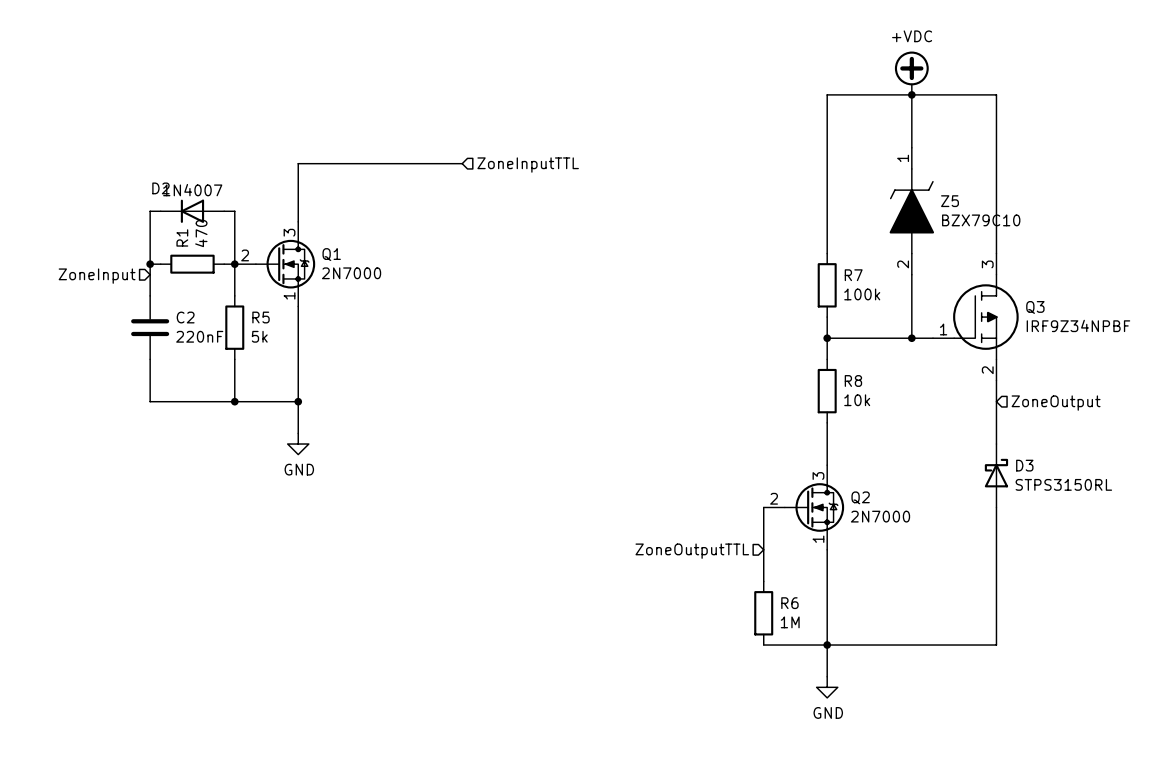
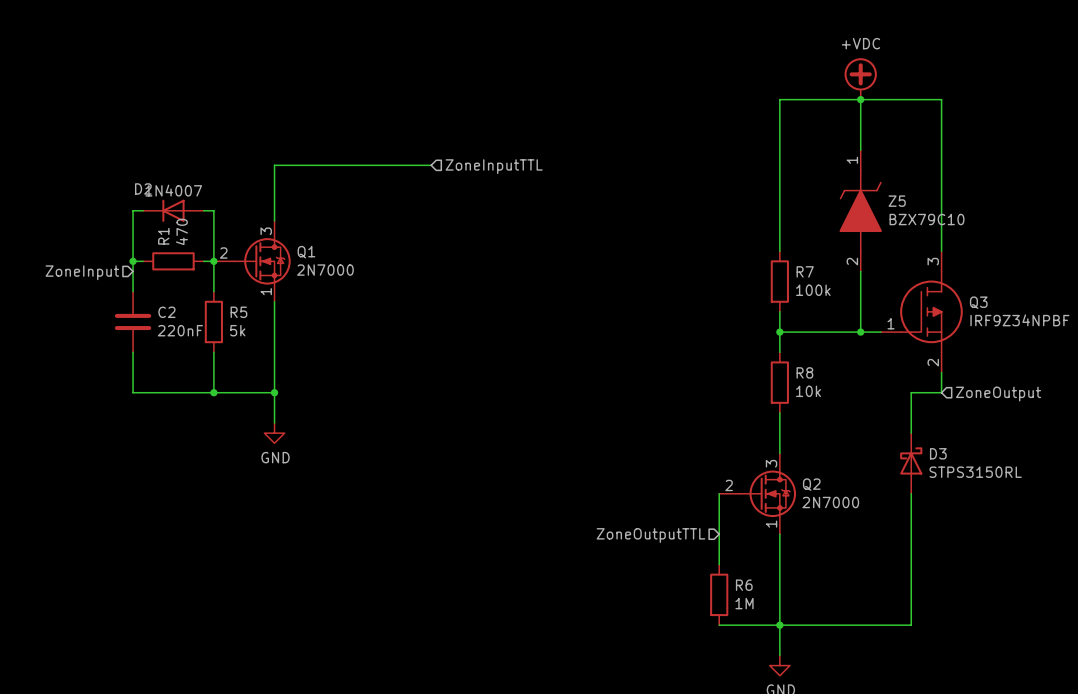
wire: (996, 401) (996, 444) -> (941, 392) (911, 392) (911, 433)
D3 position: (996, 475) -> (911, 463)
wire: (996, 507) (996, 645) (964, 645) -> (911, 493) (911, 625)

